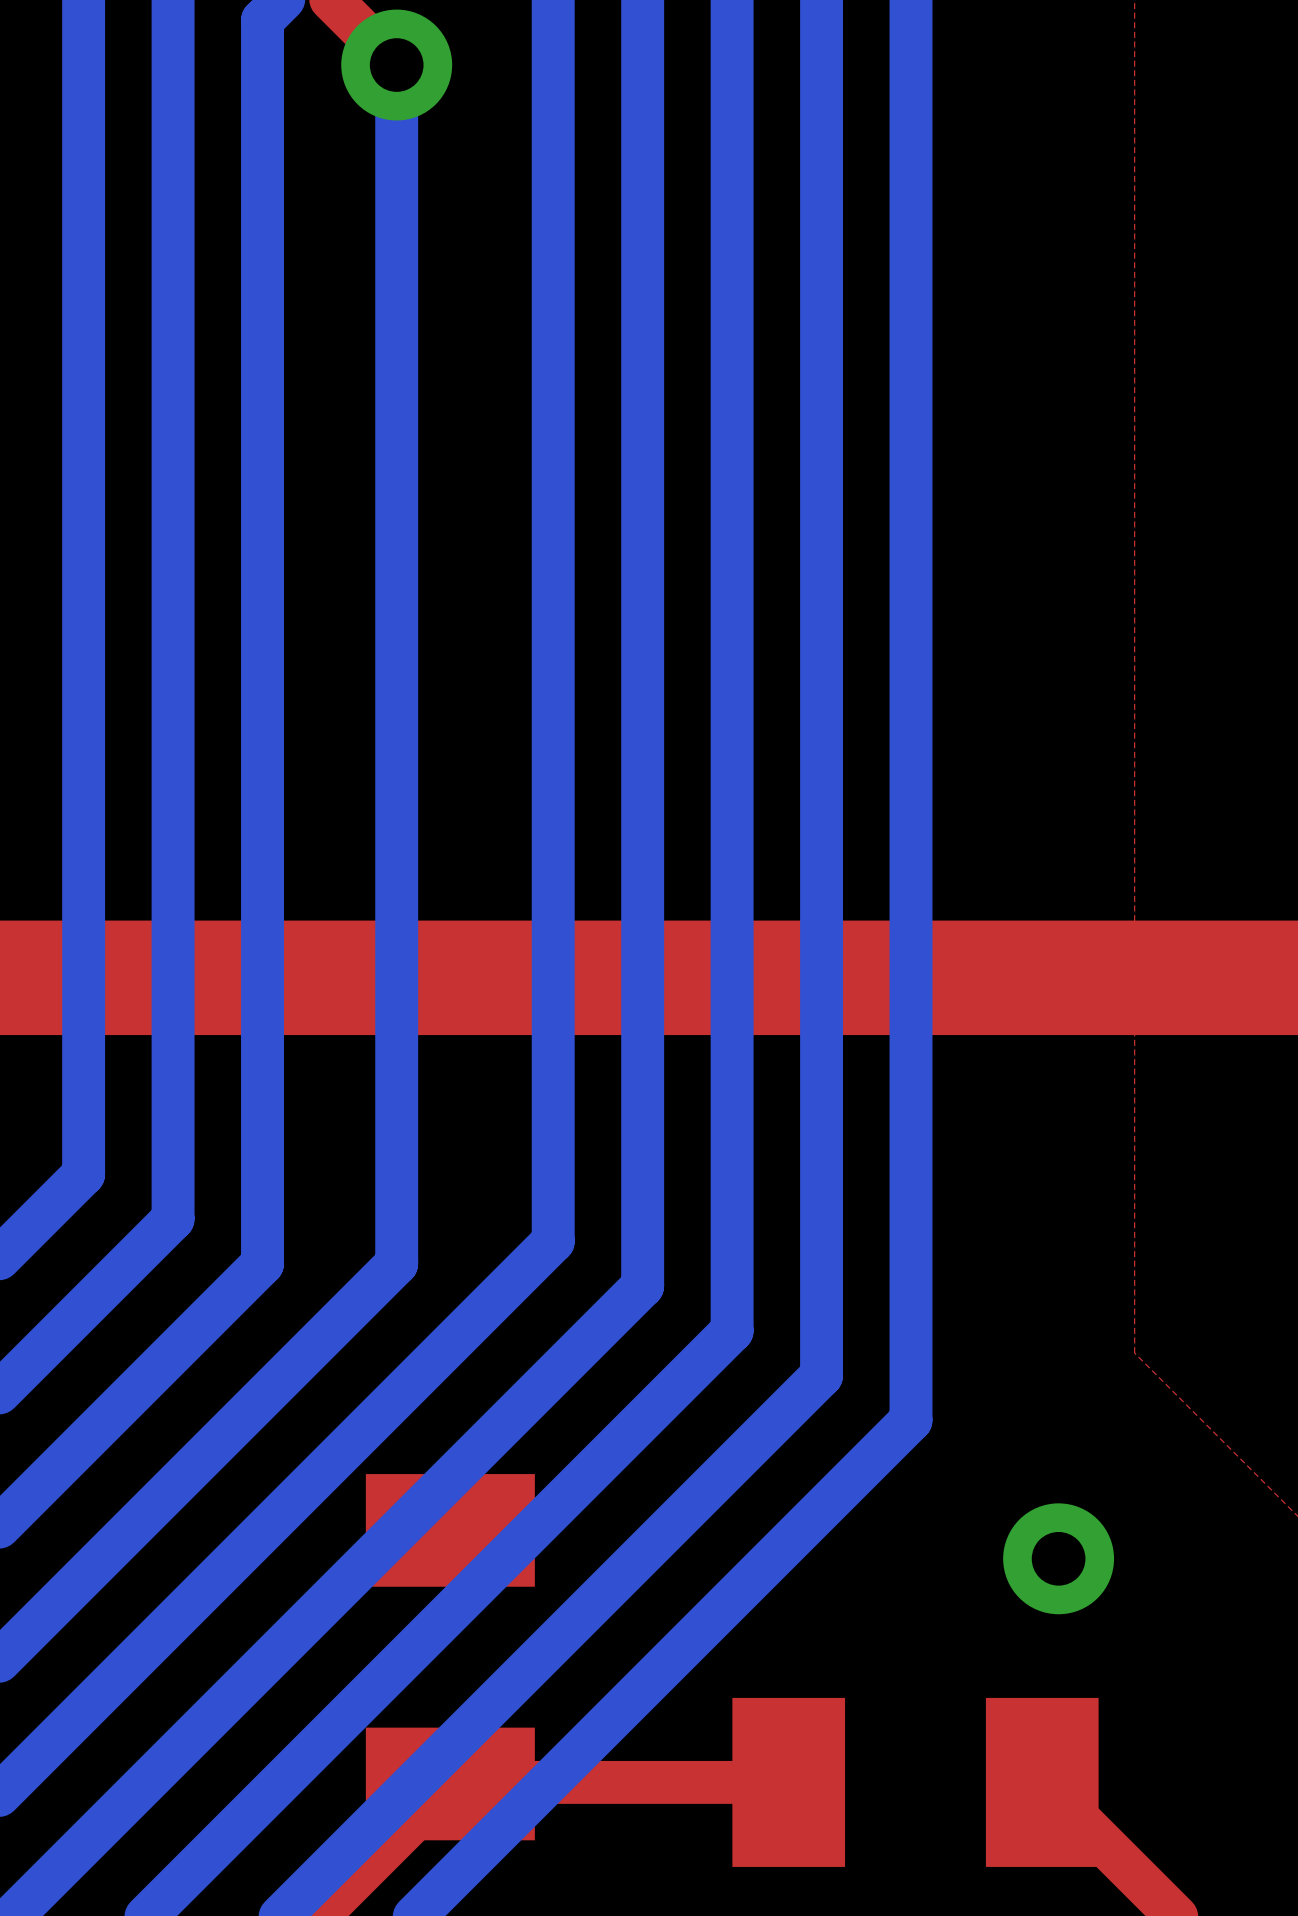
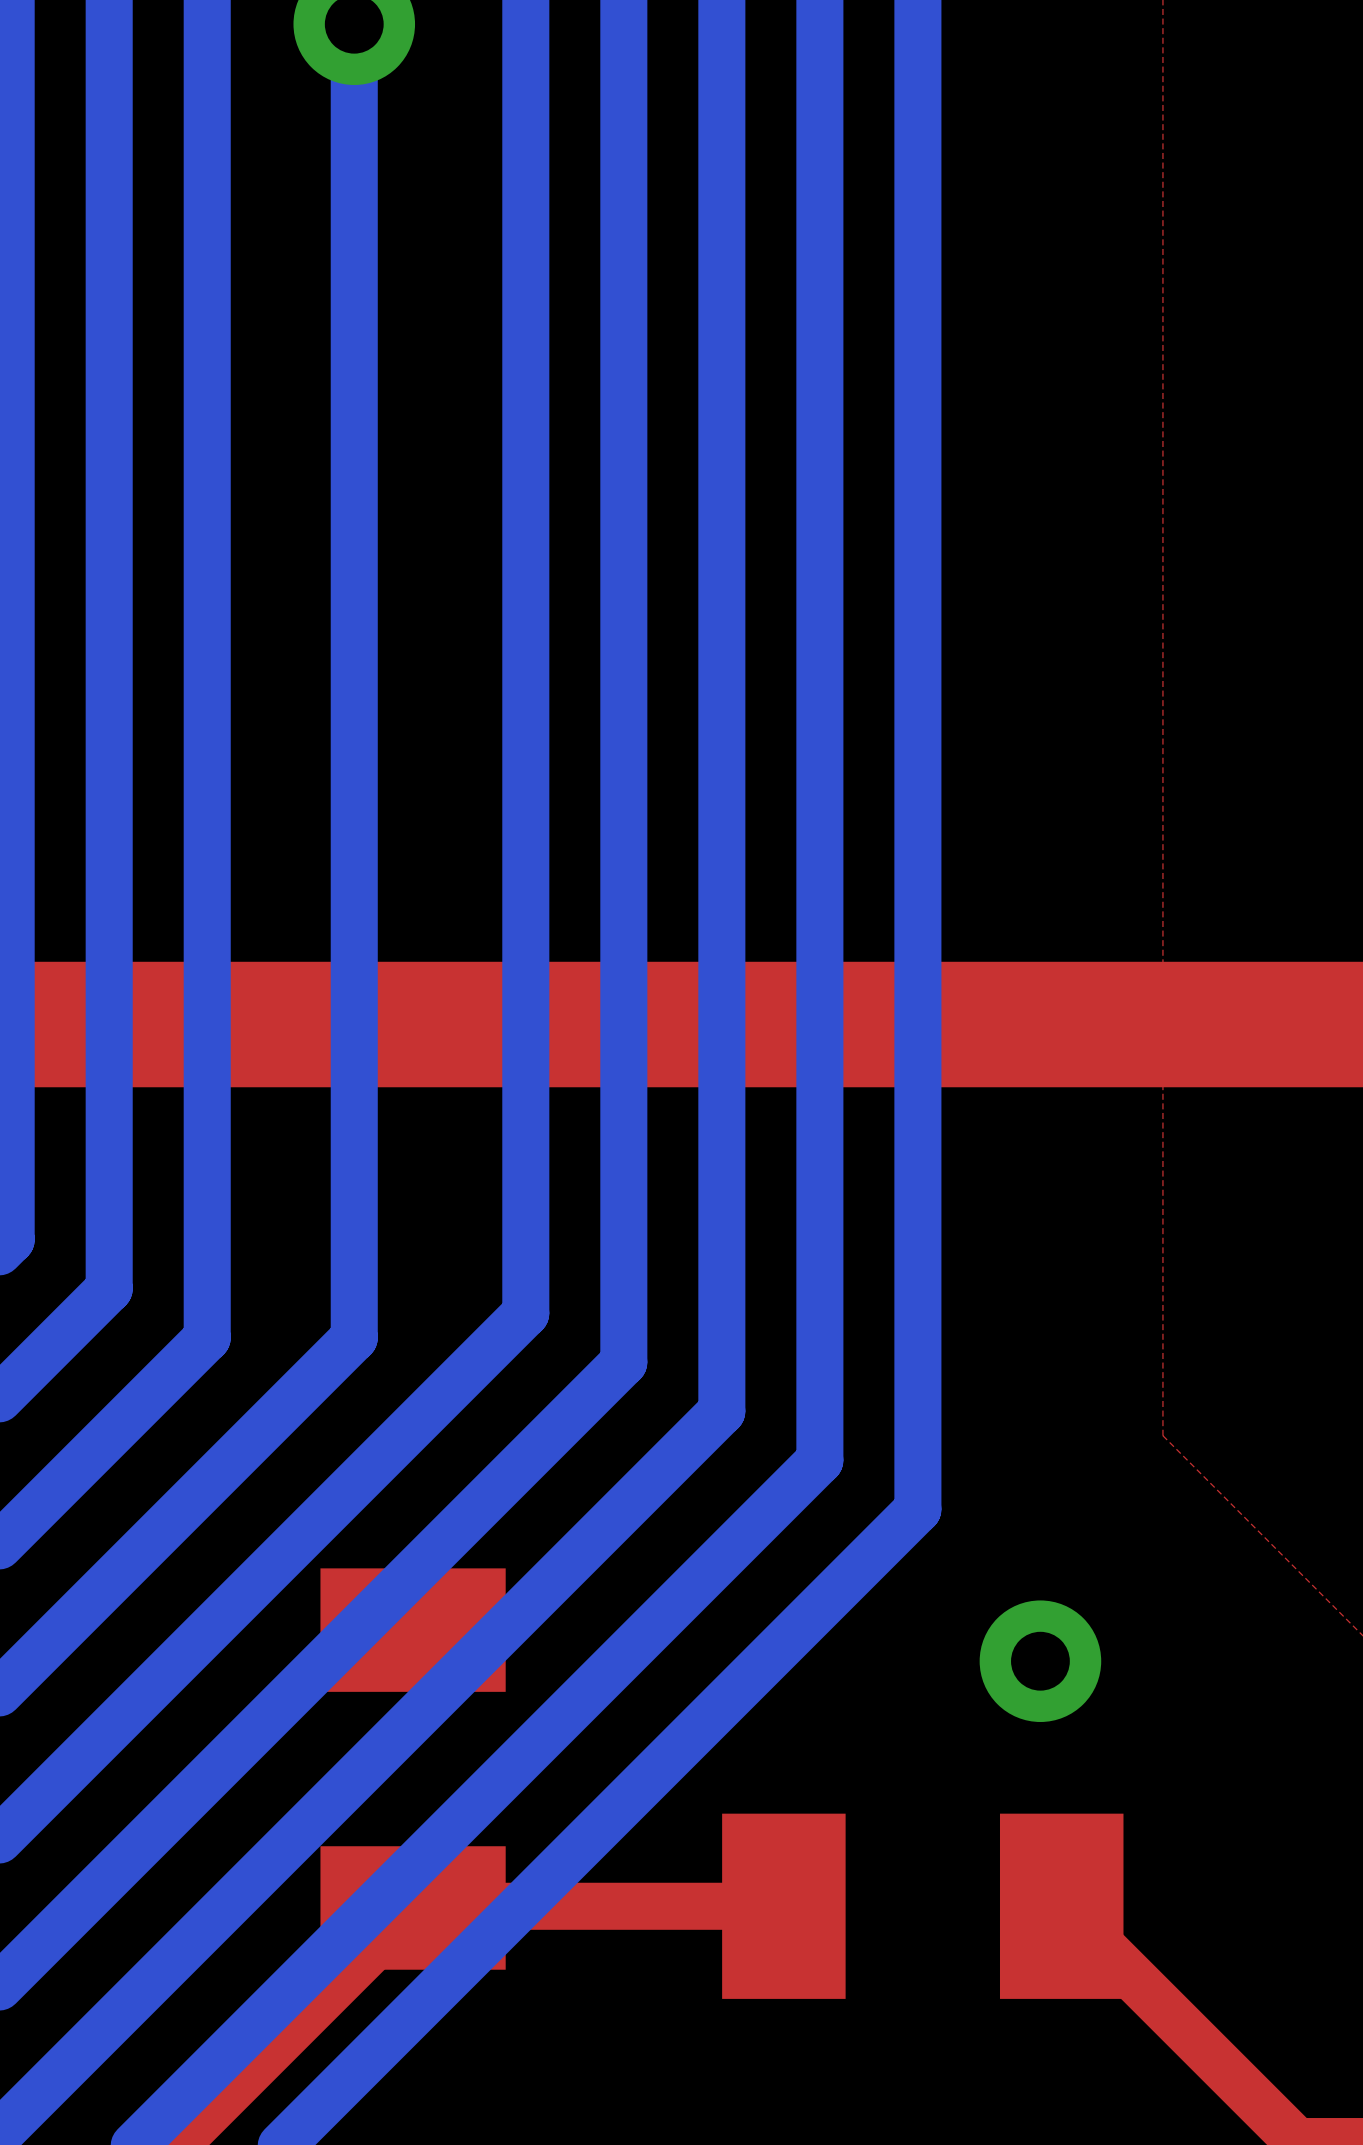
via position: (1058, 1558) -> (1040, 1661)

